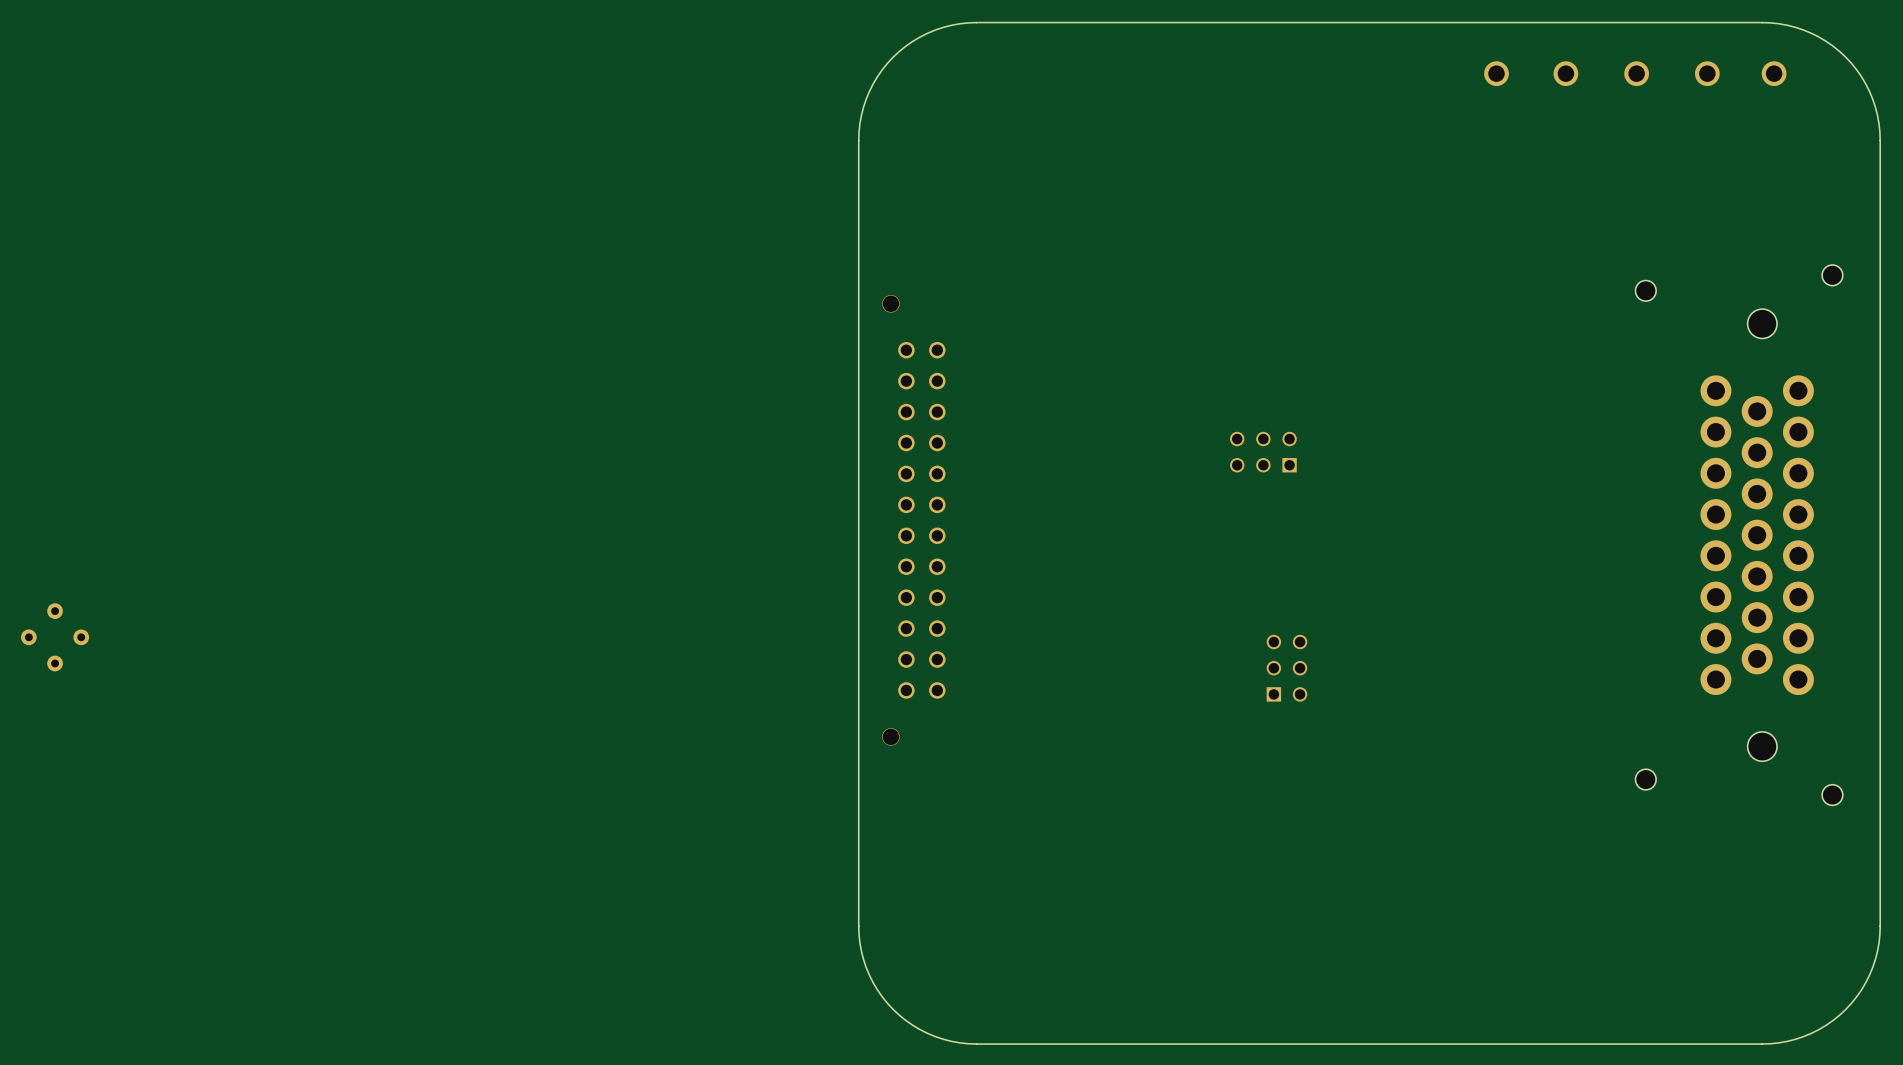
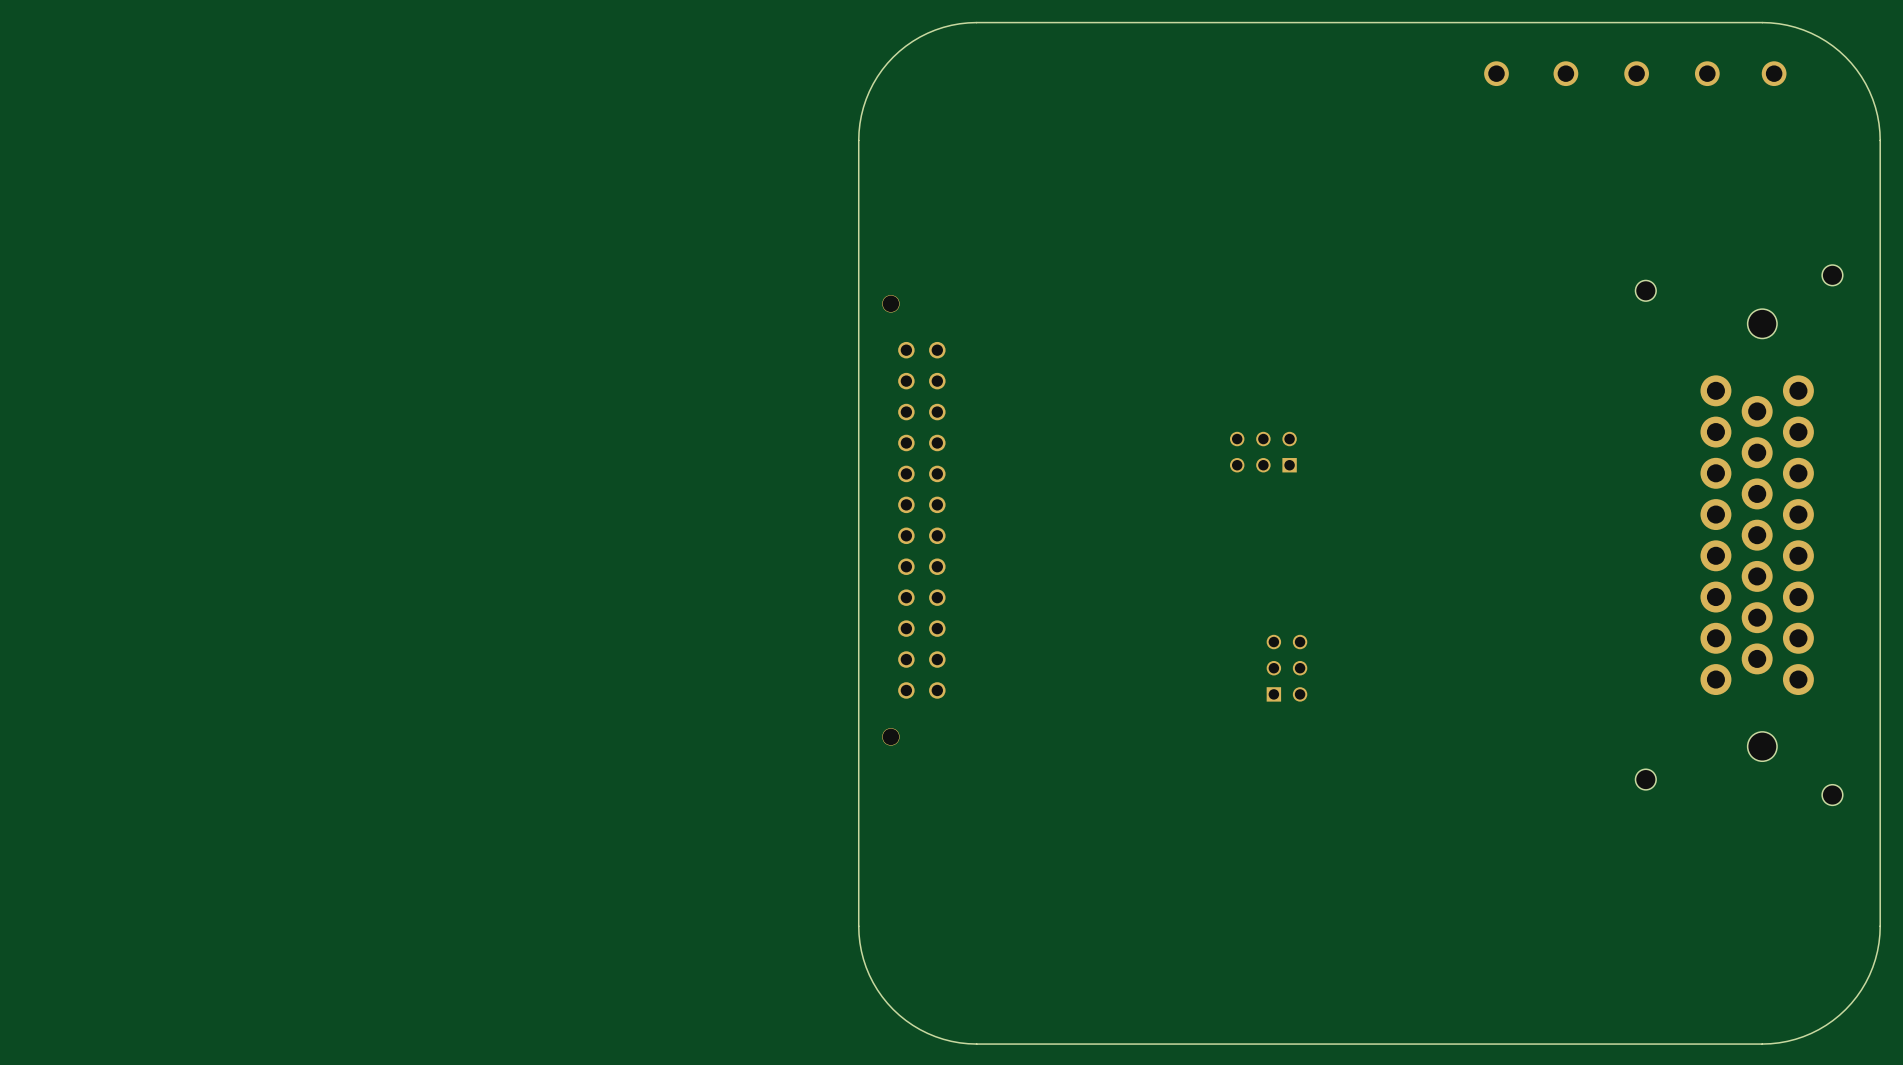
part: (55, 637) -> none

